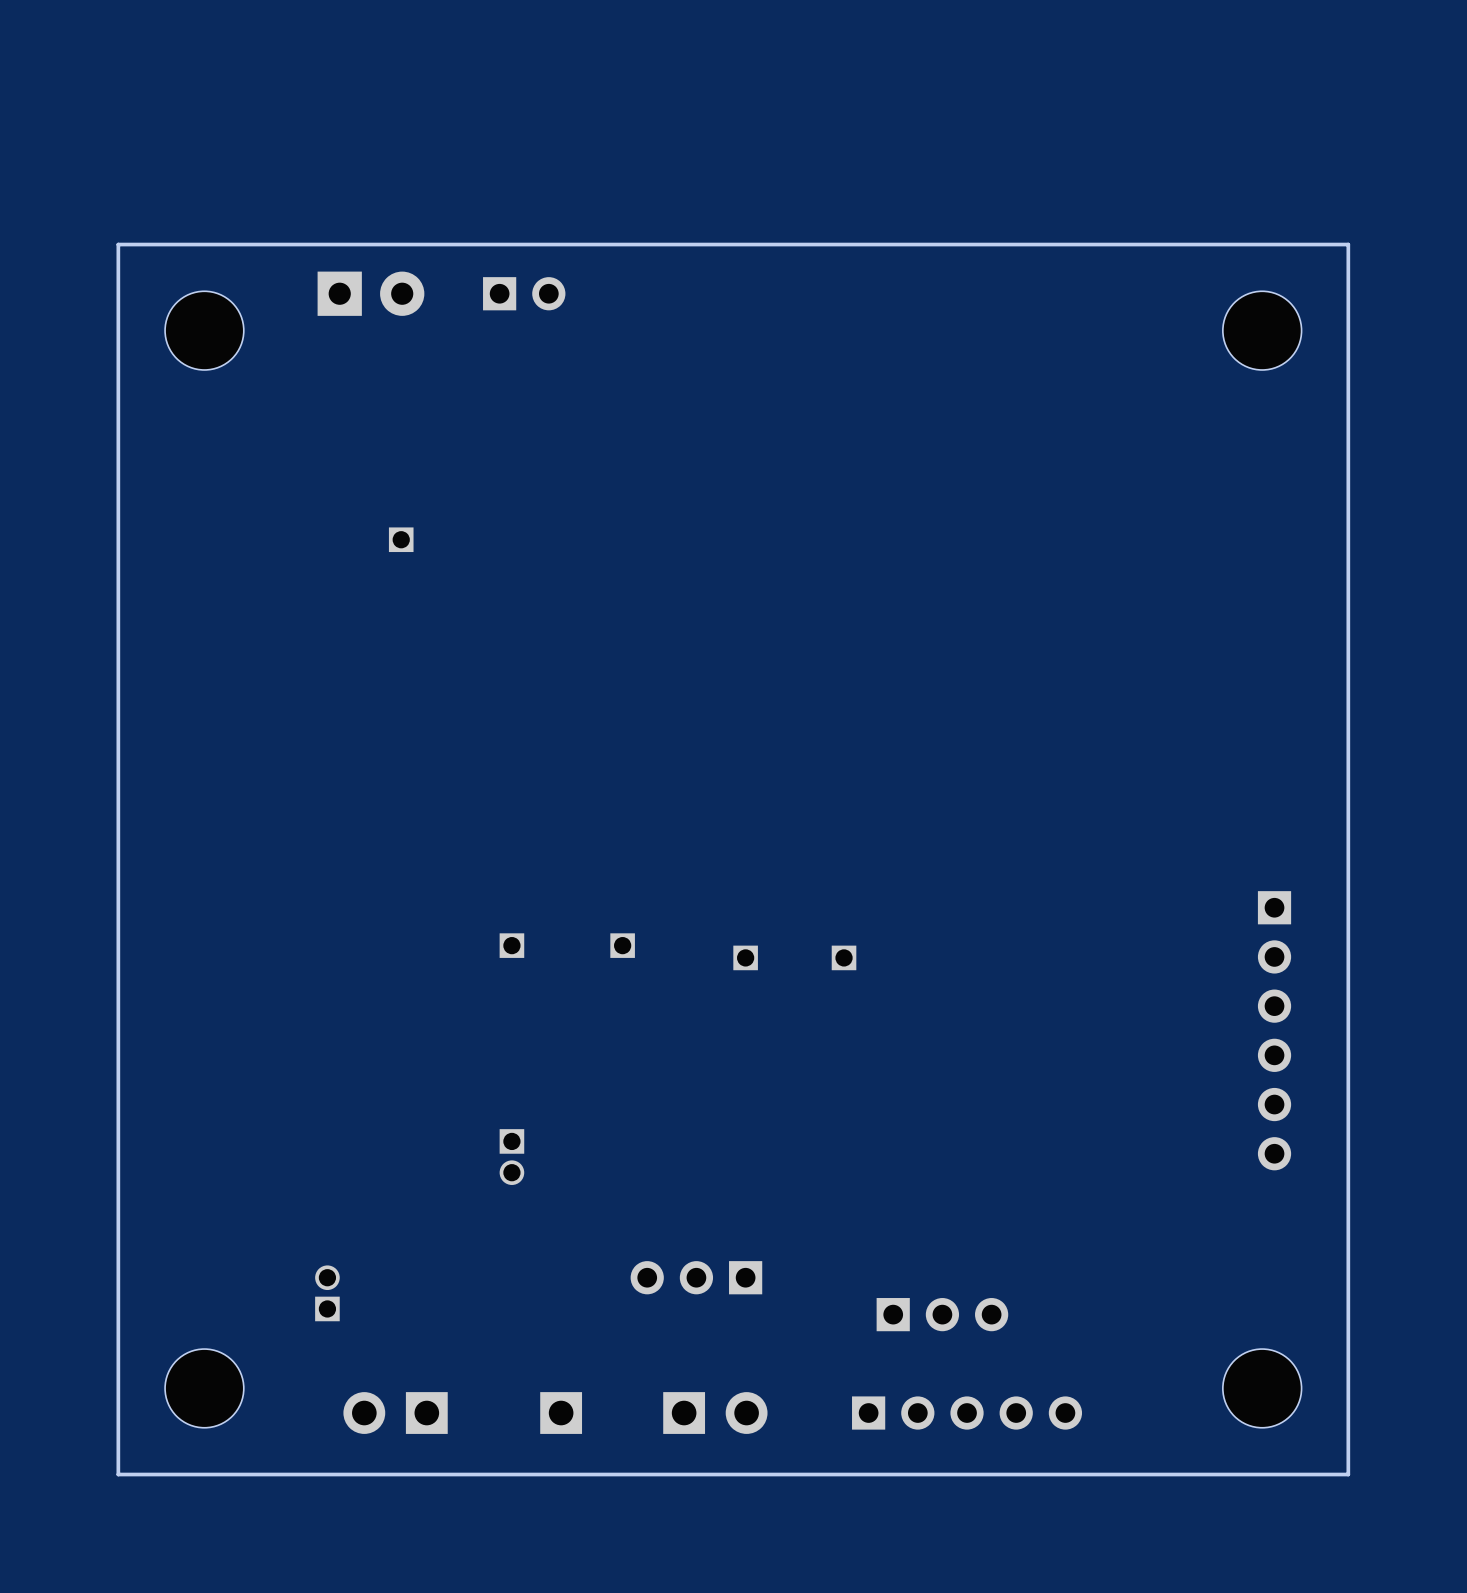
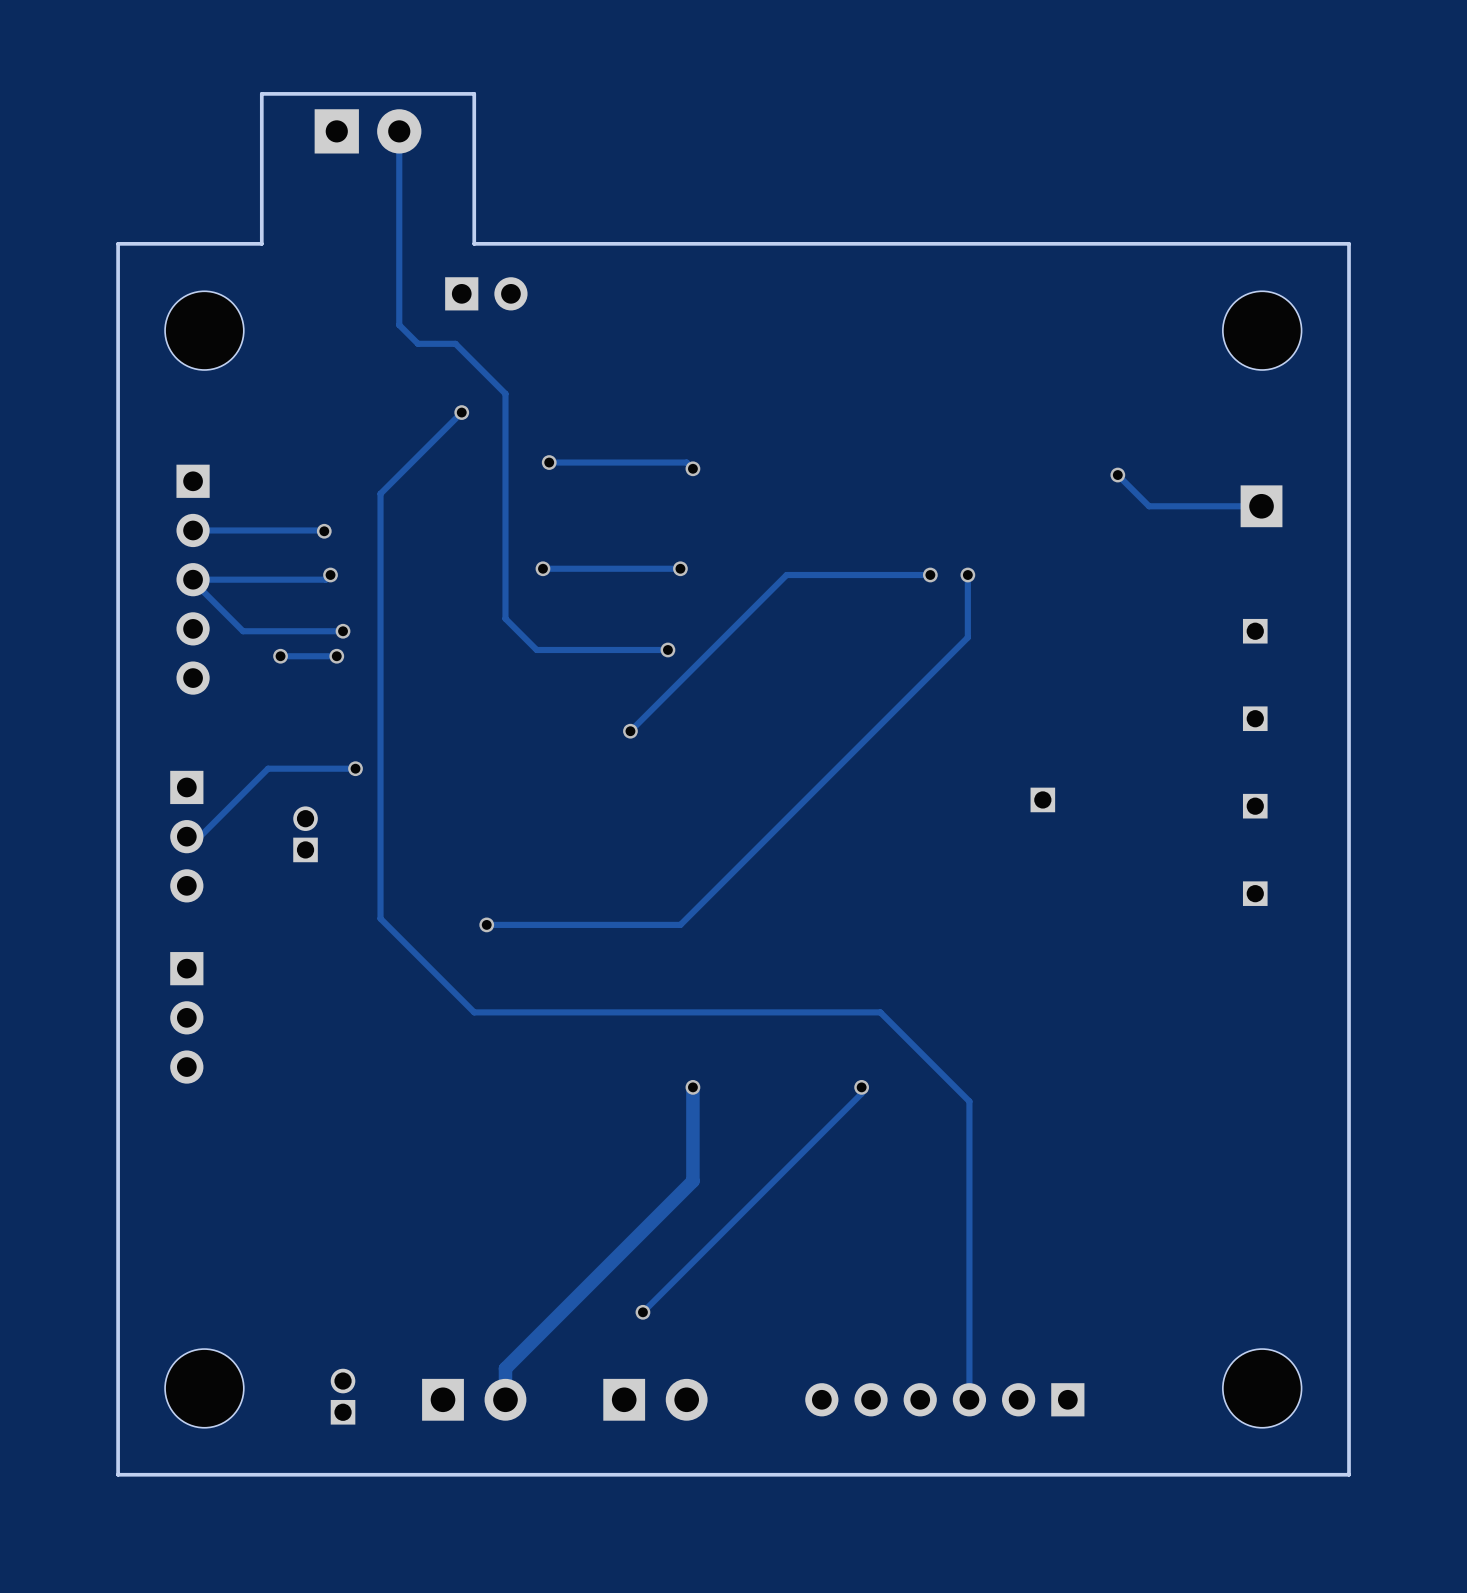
track: none -> (399, 131) (399, 325) (418, 343) (455, 343) (505, 393) (505, 618) (536, 649) (667, 649)
board edge: (1348, 244) (118, 244) (118, 1474) (1348, 1474) (1348, 244) -> (474, 93) (474, 243) (1349, 243) (1349, 1474) (118, 1474) (118, 243) (261, 243) (261, 93) (474, 93)
part position: (370, 293) -> (368, 131)
part position: (524, 293) -> (486, 293)
track: none -> (461, 412) (380, 493) (380, 918) (474, 1012) (880, 1012) (969, 1101) (969, 1399)
via: none -> (461, 412)
track: none -> (549, 462) (686, 462) (692, 468)
via: none -> (549, 462)
via: none -> (692, 468)
track: none -> (1117, 475) (1149, 506) (1261, 506)
via: none -> (1117, 475)
part: none -> (1261, 506)
track: none -> (193, 530) (324, 531)
via: none -> (324, 531)
part: (401, 539) -> none
via: none -> (542, 568)
track: none -> (680, 568) (542, 568)
via: none -> (680, 568)
track: none -> (330, 575) (325, 579) (193, 579) (193, 581) (243, 631) (343, 631)
via: none -> (330, 575)
track: none -> (930, 575) (786, 575) (630, 731)
via: none -> (930, 575)
track: none -> (967, 575) (967, 637) (680, 924) (486, 924)
via: none -> (967, 575)
part: none -> (193, 579)
via: none -> (343, 631)
part: none -> (1255, 631)
via: none -> (667, 649)
via: none -> (280, 656)
track: none -> (336, 656) (280, 656)
via: none -> (336, 656)
part: none -> (1255, 718)
via: none -> (630, 731)
track: none -> (355, 768) (268, 768) (200, 836) (186, 836)
via: none -> (355, 768)
part: none -> (1042, 799)
part: none -> (1255, 806)
part: none -> (305, 834)
part: none -> (186, 836)
part: none -> (1255, 893)
via: none -> (486, 924)
part: (511, 945) -> none
part: (622, 945) -> none
part: (745, 957) -> none
part: (844, 957) -> none
part: none -> (186, 1017)
part rotation: 0° (1274, 1030) -> 90° clockwise (944, 1399)
part position: (1274, 1030) -> (944, 1399)
track: none -> (692, 1087) (692, 1181) (505, 1368) (505, 1399)
via: none -> (692, 1087)
track: none -> (861, 1087) (861, 1093) (642, 1312)
via: none -> (861, 1087)
part: (511, 1157) -> none
part: (696, 1277) -> none
part position: (327, 1293) -> (343, 1396)
via: none -> (642, 1312)
part: (942, 1314) -> none
part rotation: 0° (395, 1413) -> 180° (474, 1399)
part position: (395, 1413) -> (474, 1399)
part: (561, 1413) -> none
part position: (715, 1413) -> (655, 1399)
part: (967, 1413) -> none

